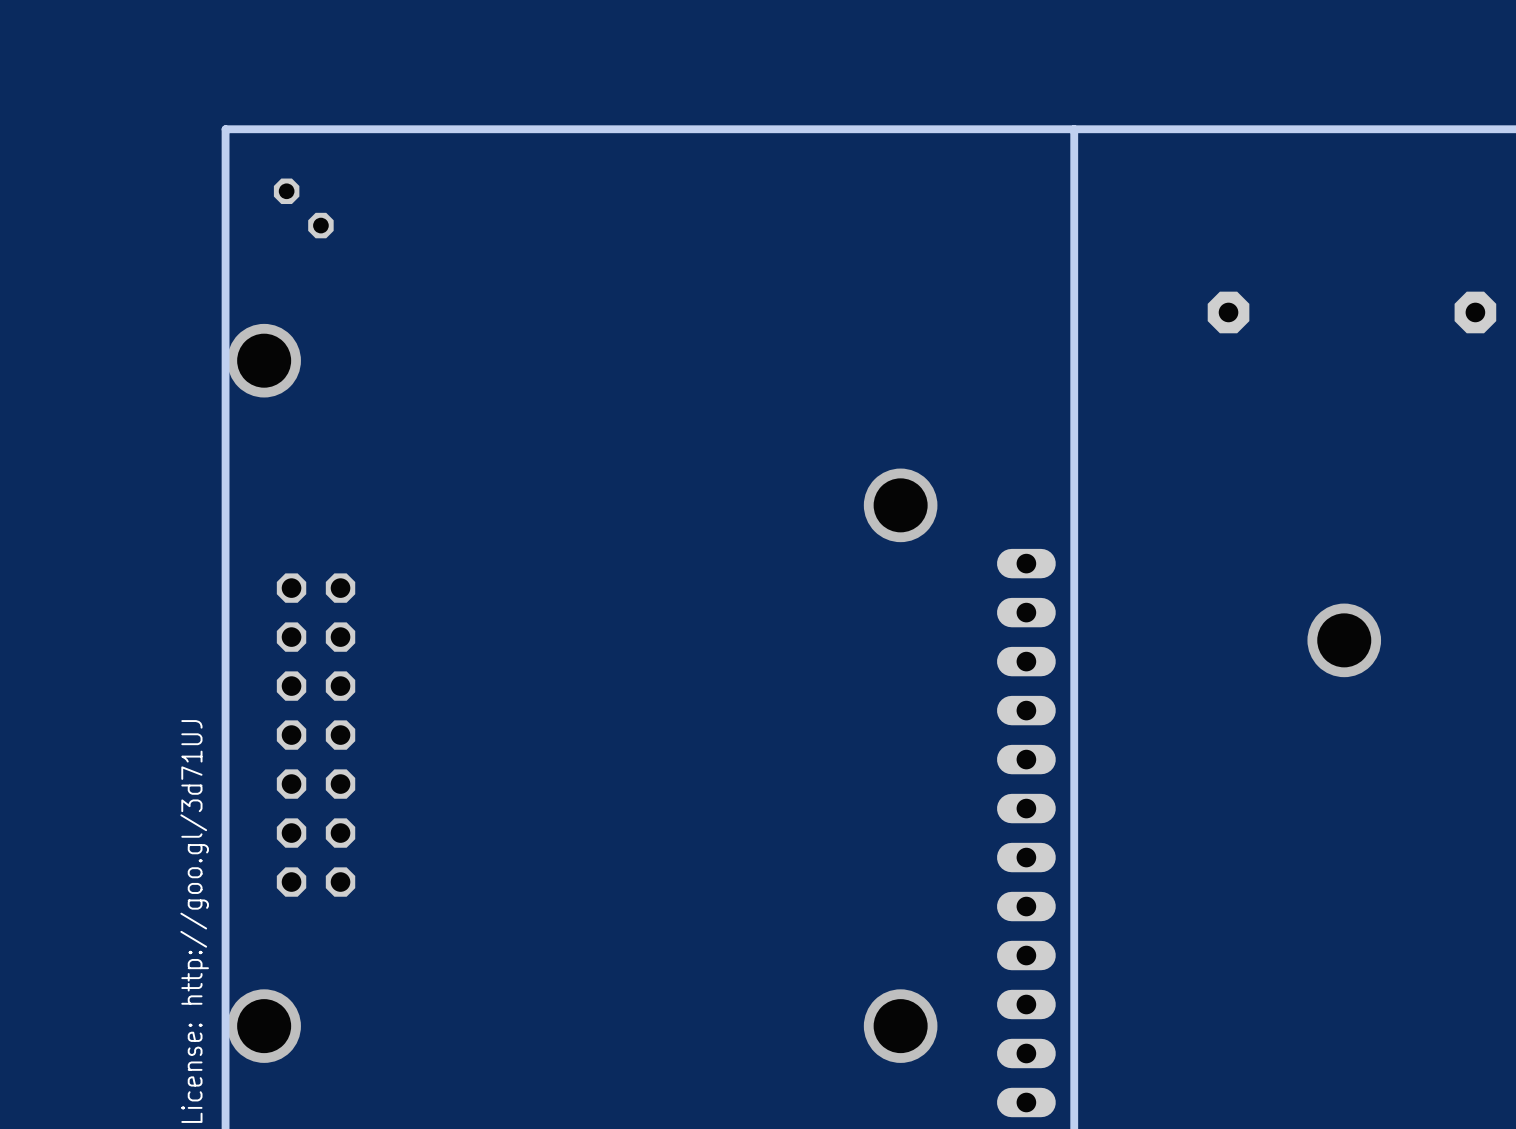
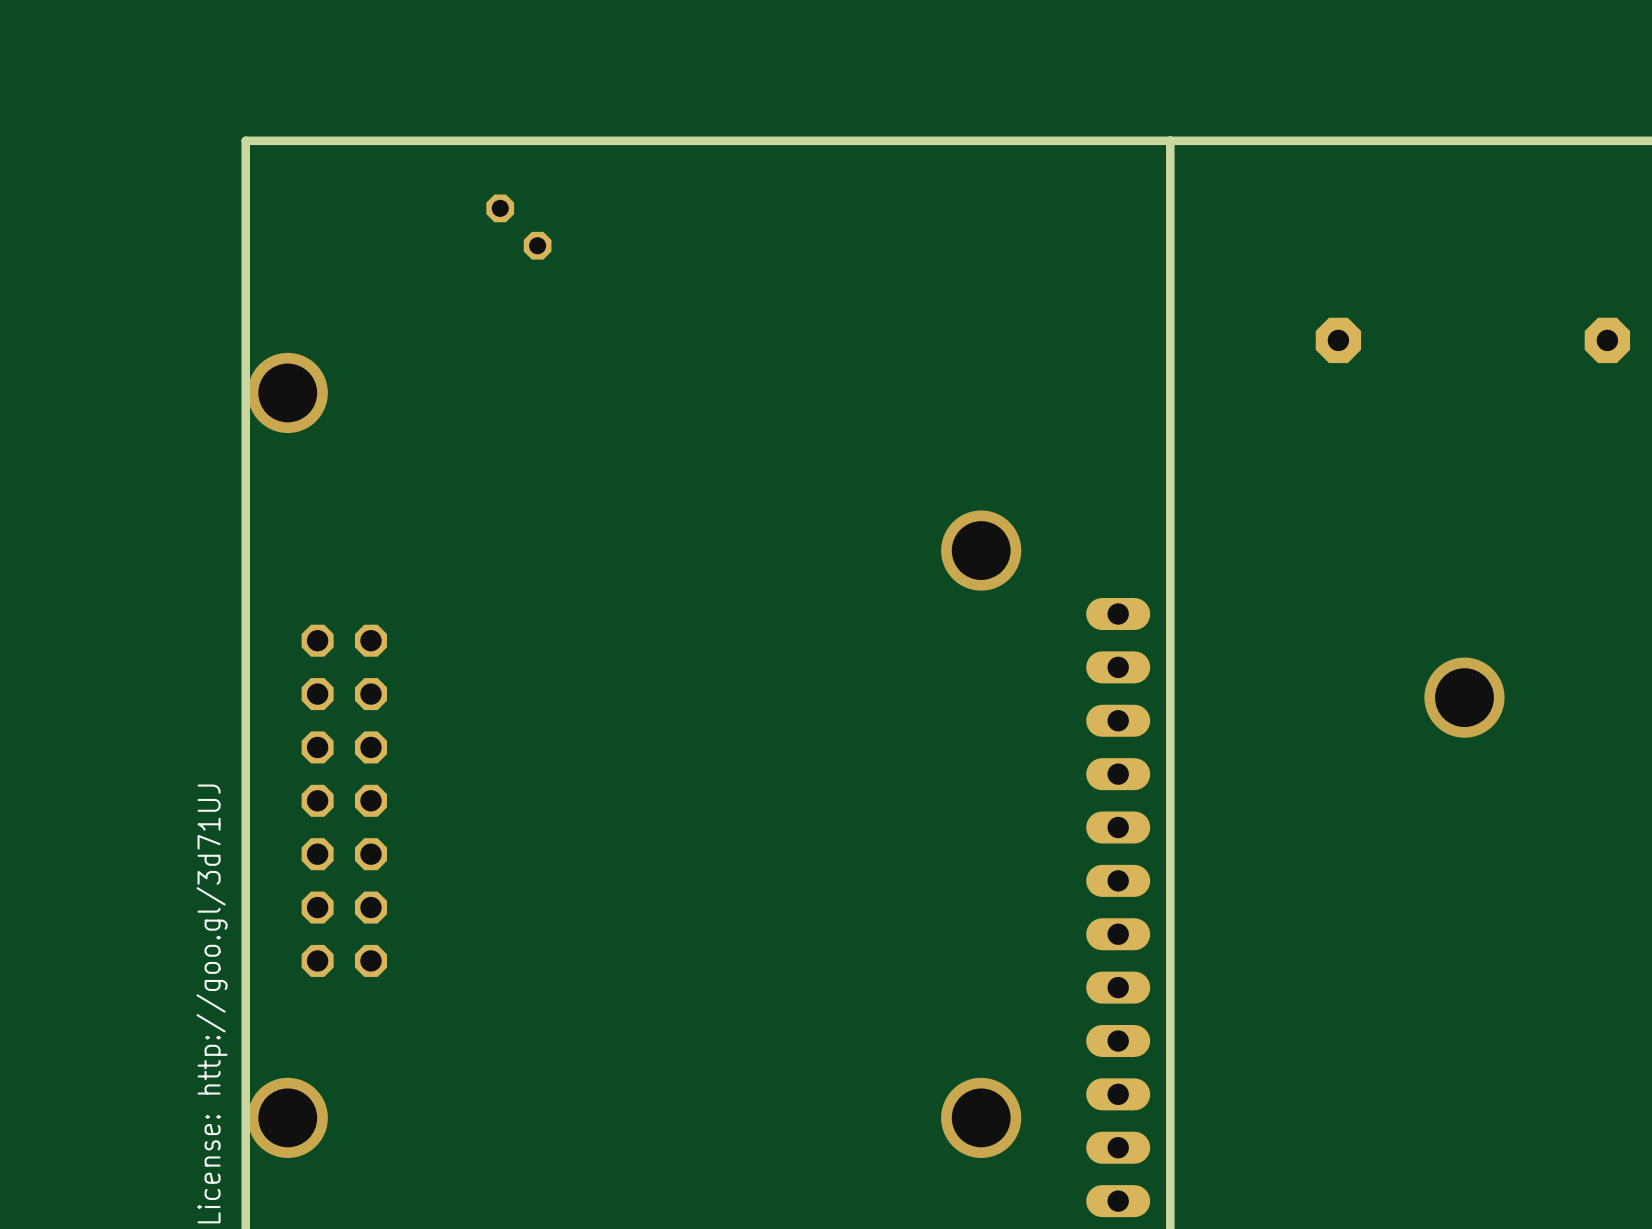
part position: (303, 208) -> (518, 227)

